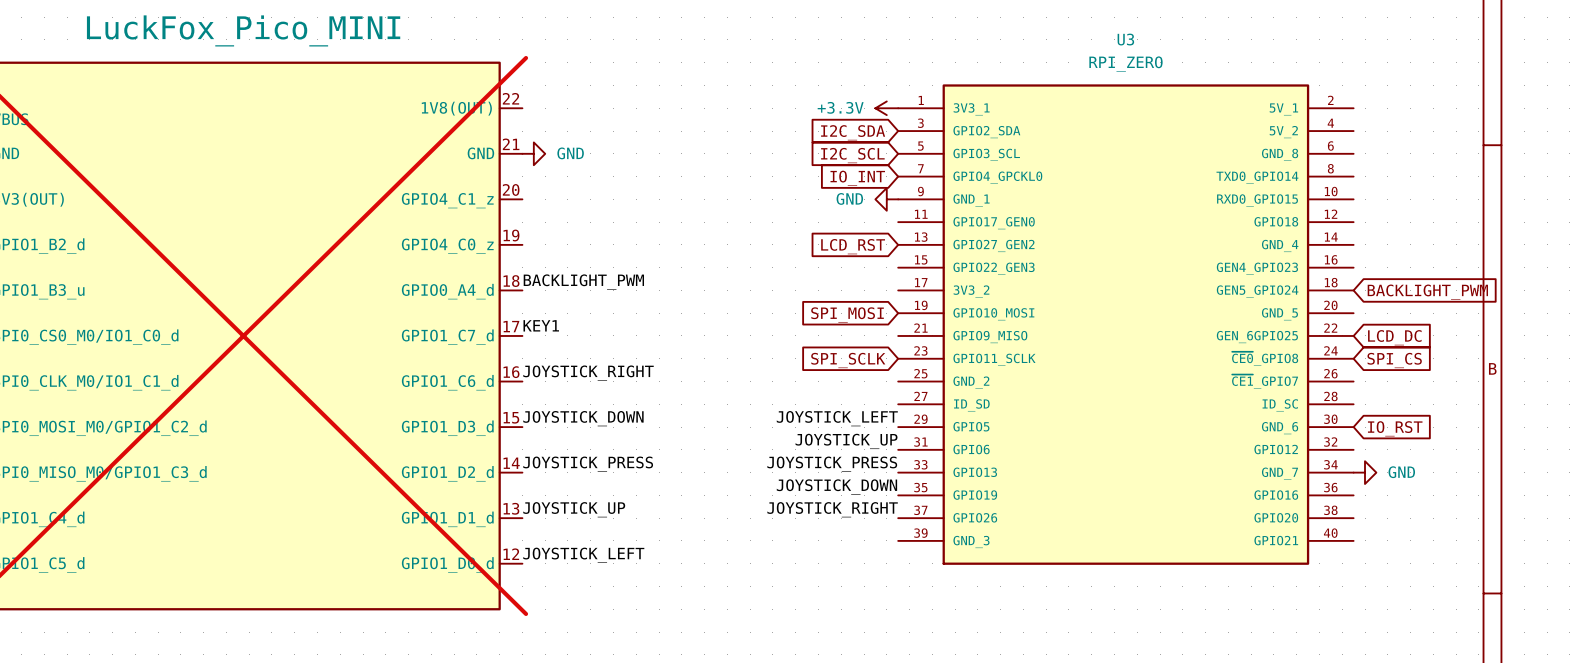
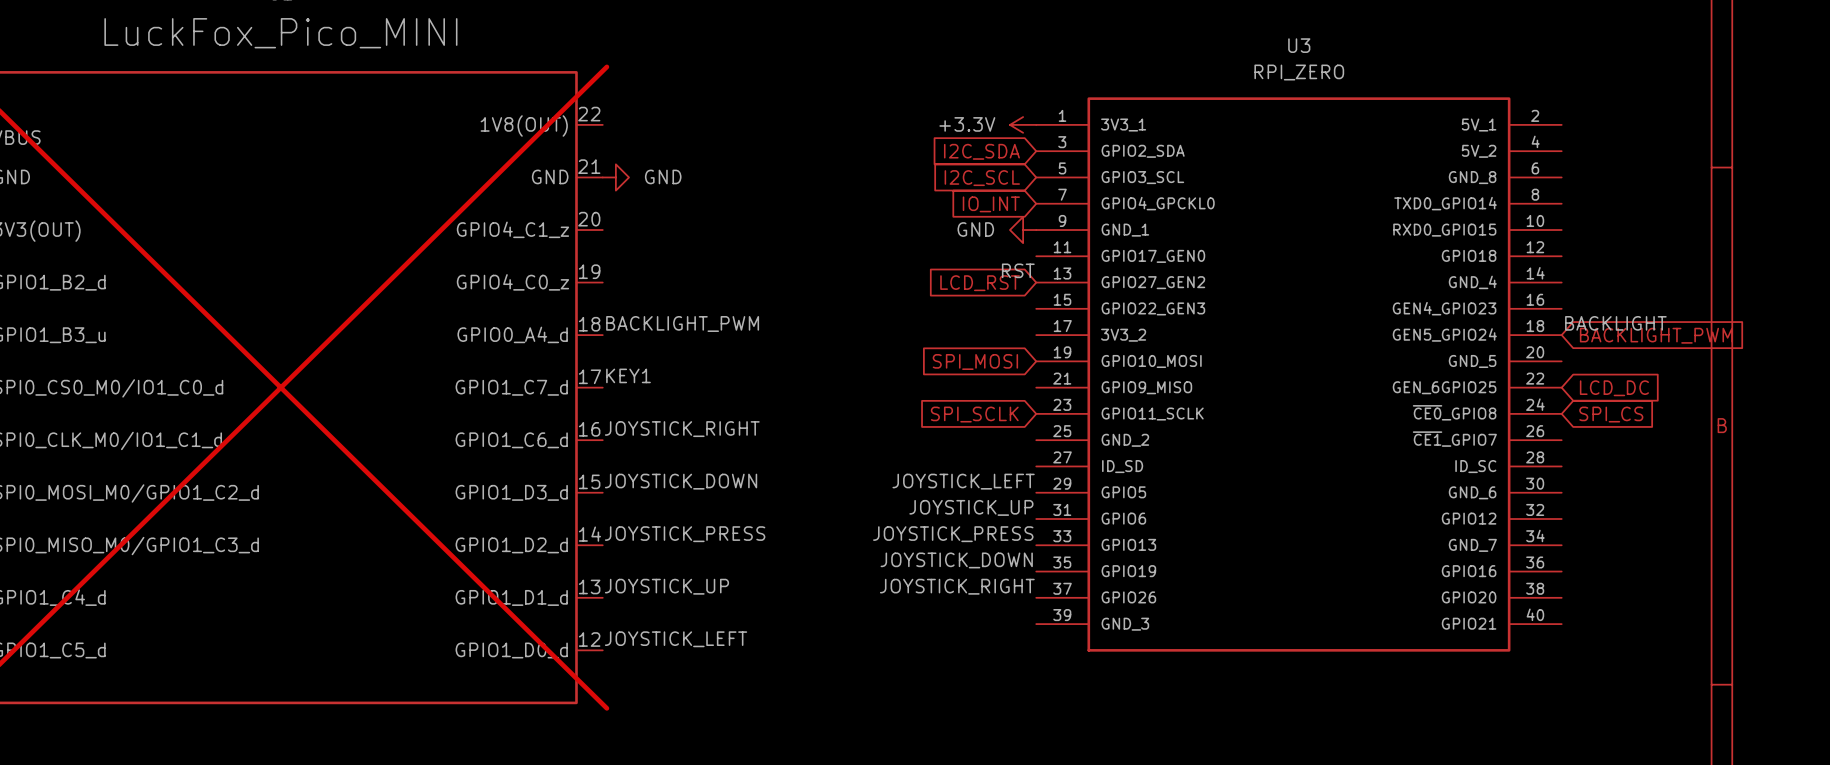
label: none -> RST (1018, 270)
label: none -> BACKLIGHT (1615, 323)
global label: IO_RST (1395, 428) -> none
power symbol: GND (1365, 472) -> none

